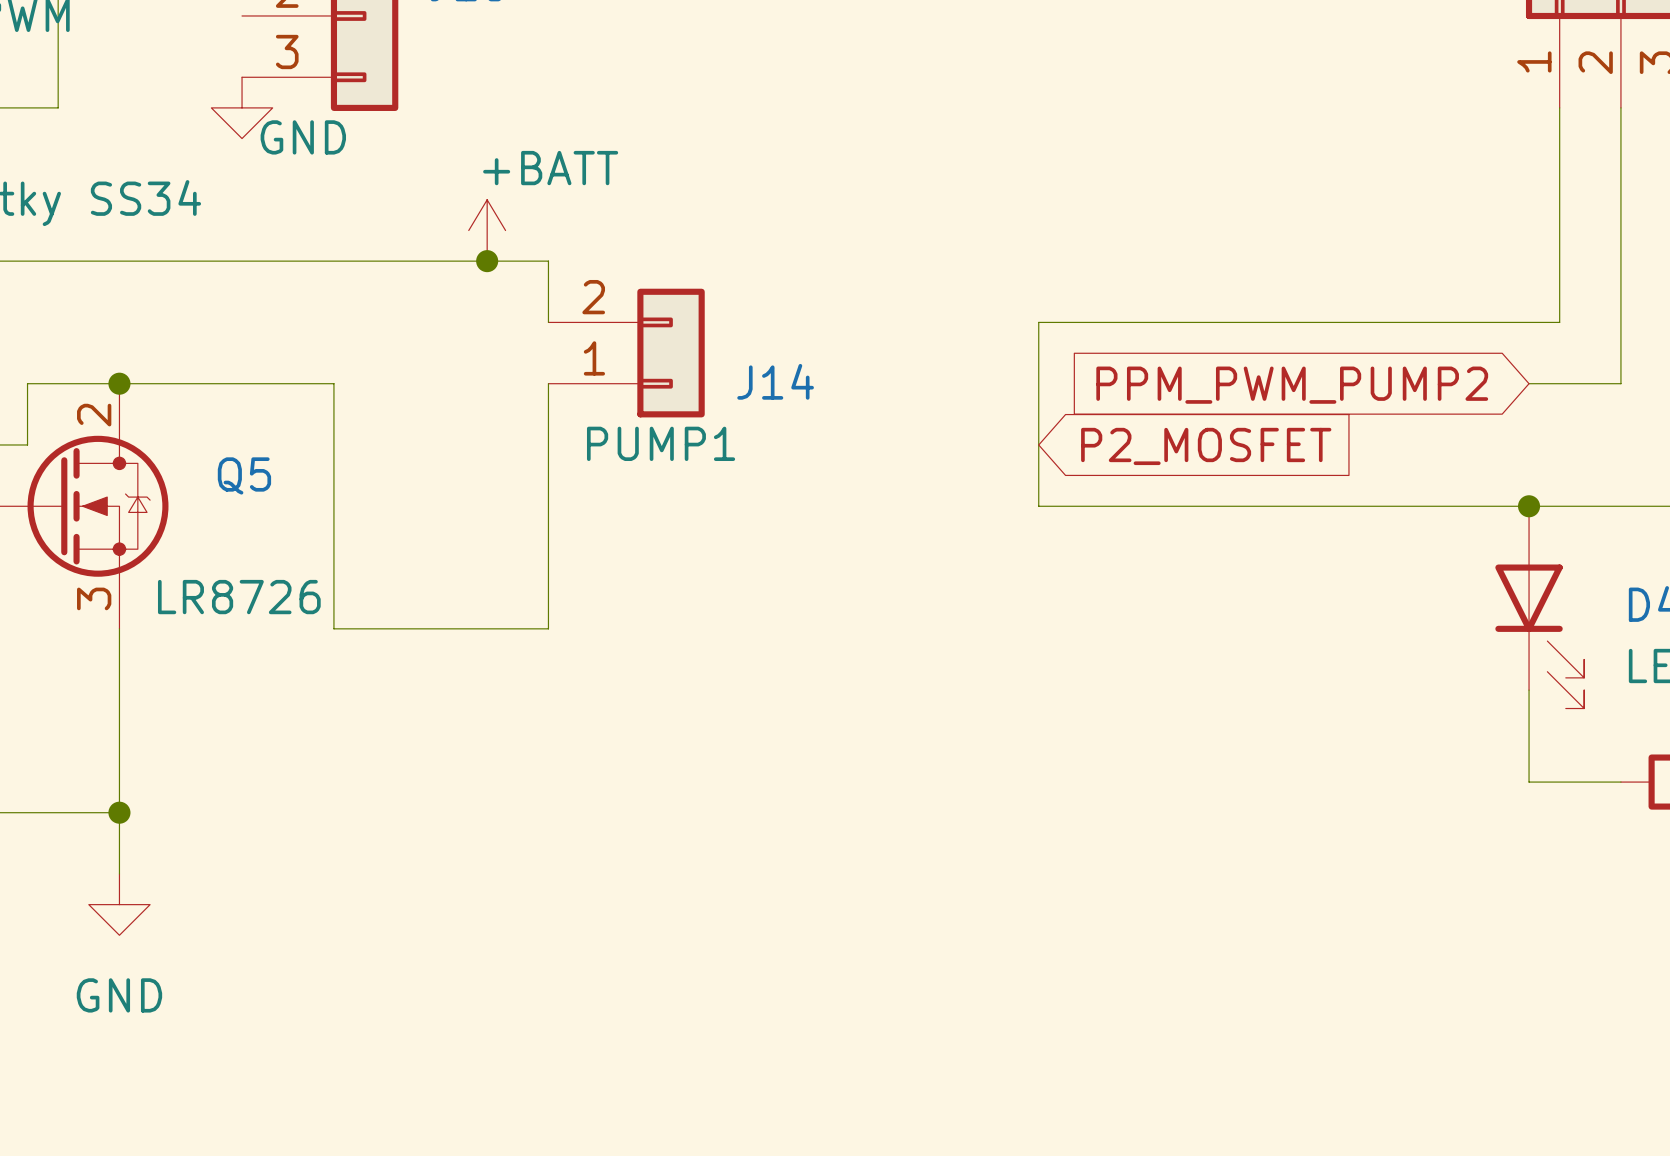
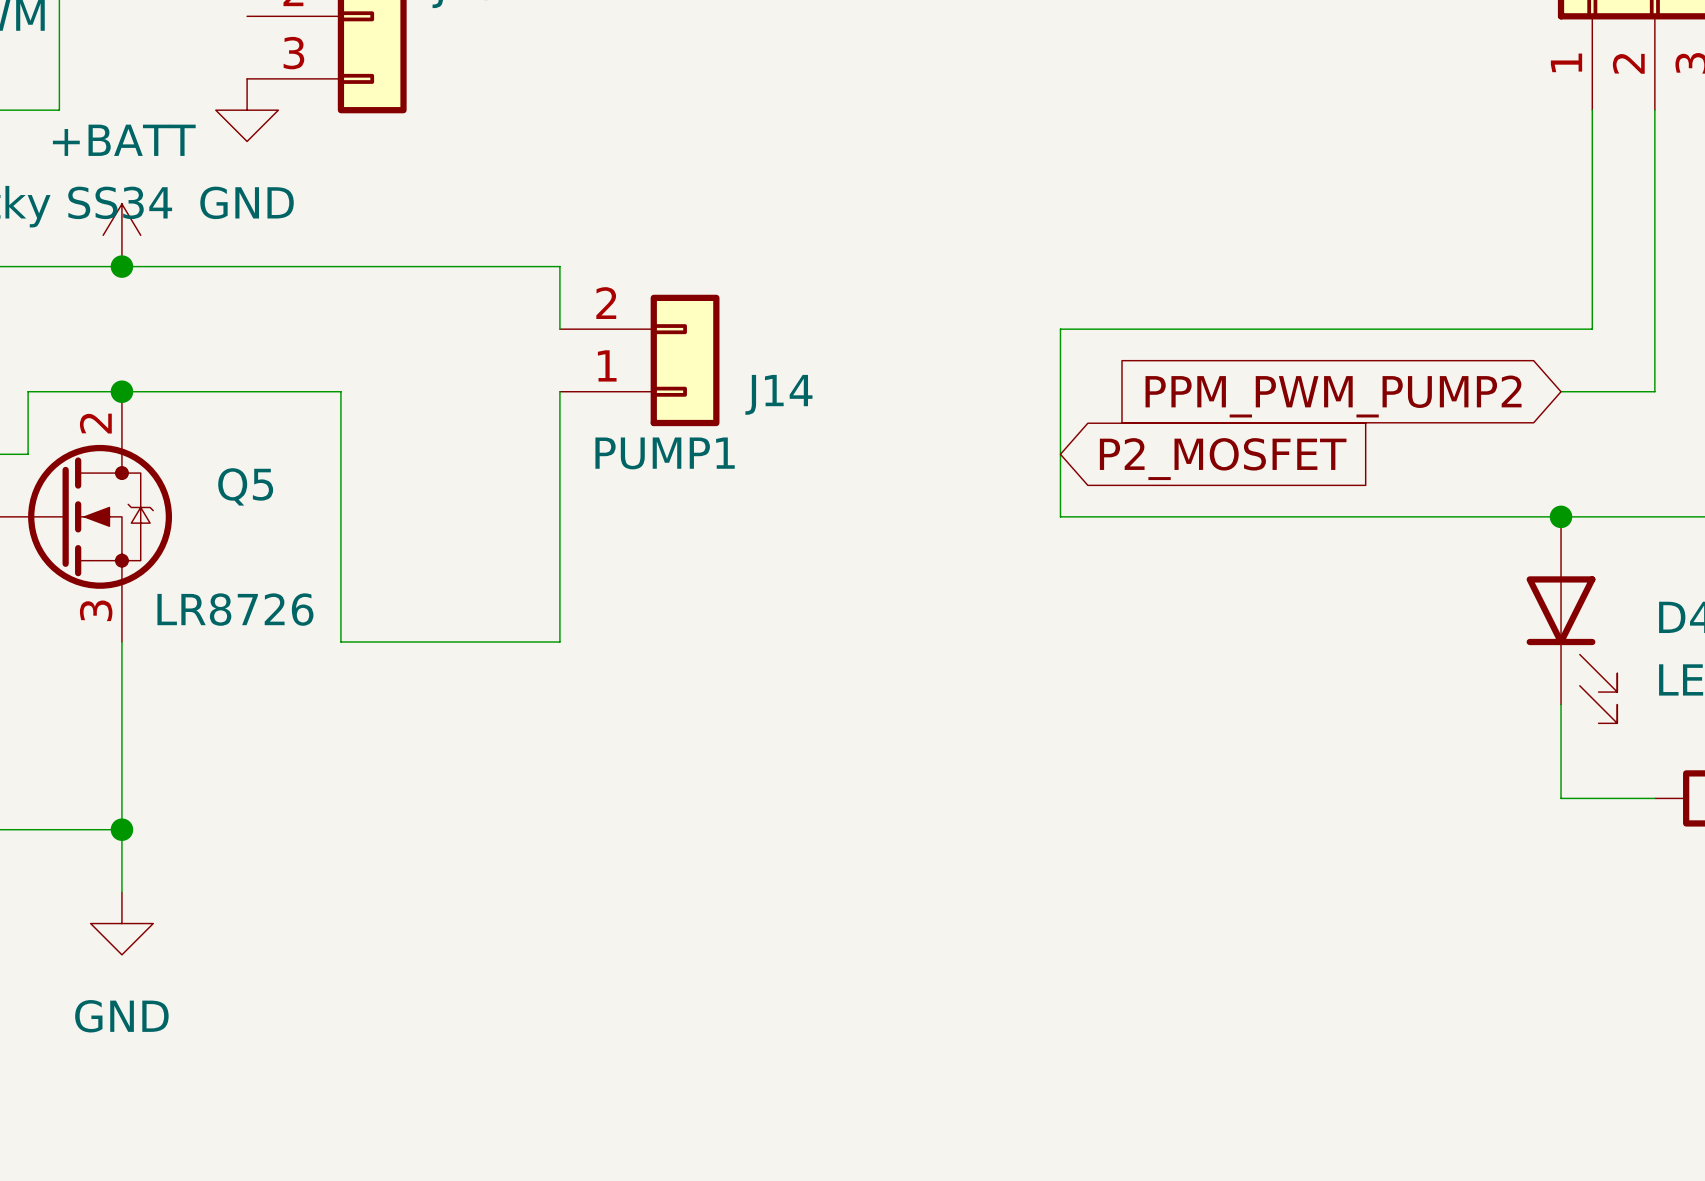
power symbol text position: GND (303, 137) -> GND (247, 202)
power symbol text position: +BATT (550, 168) -> +BATT (124, 140)
power symbol position: +BATT (487, 230) -> +BATT (121, 235)
junction: none -> (121, 266)
junction: (487, 261) -> none

